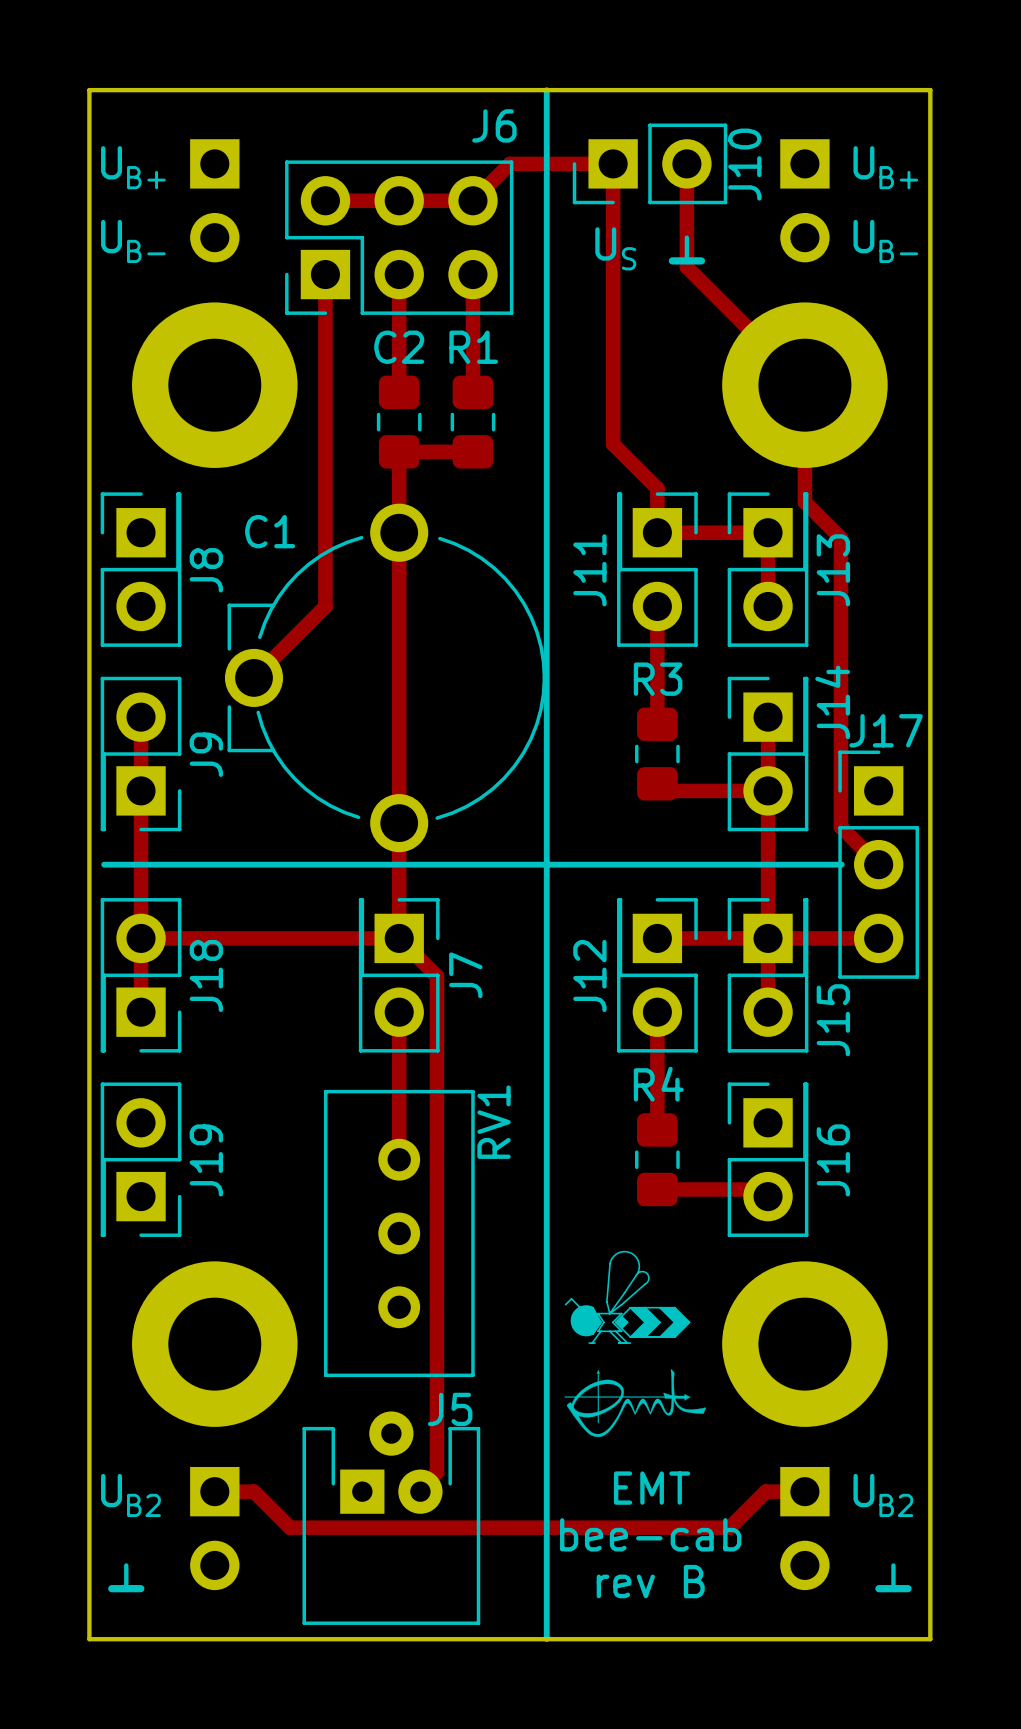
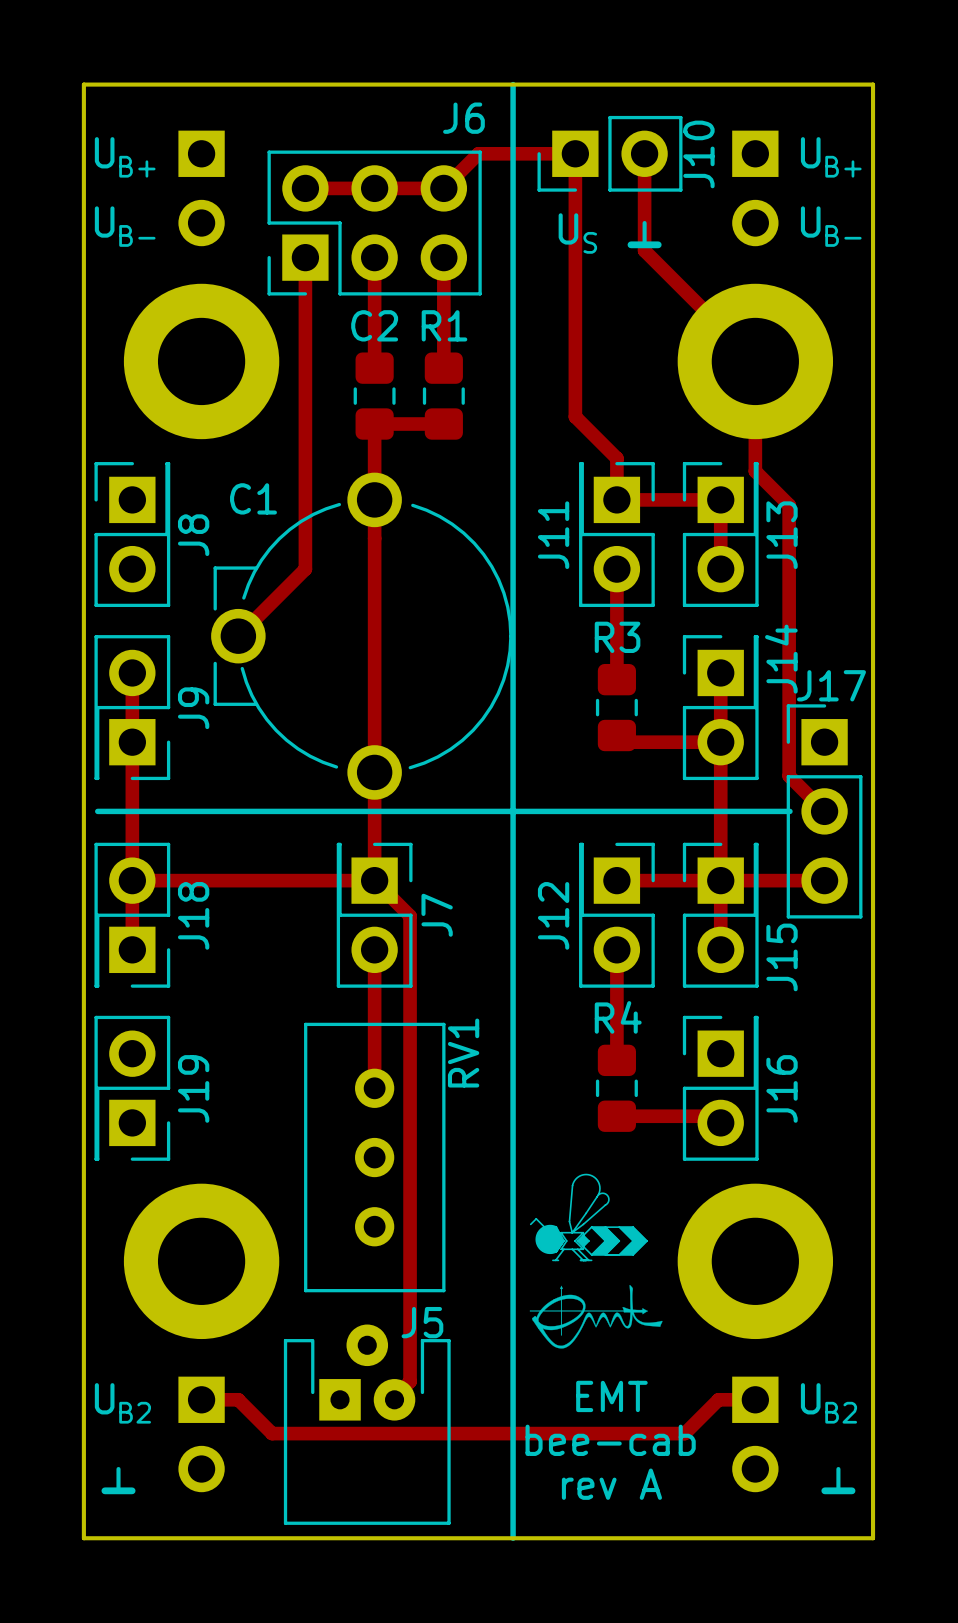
text: rev B (650, 1581) -> rev A (611, 1484)

